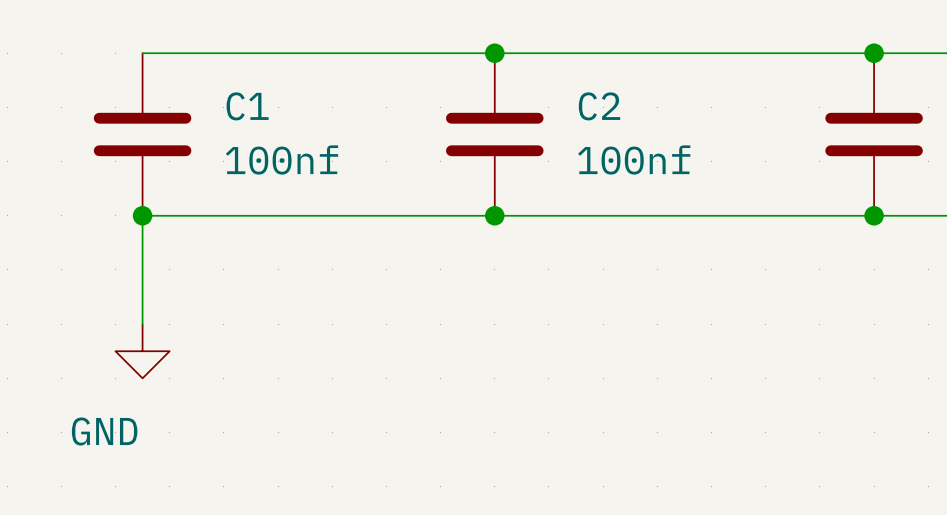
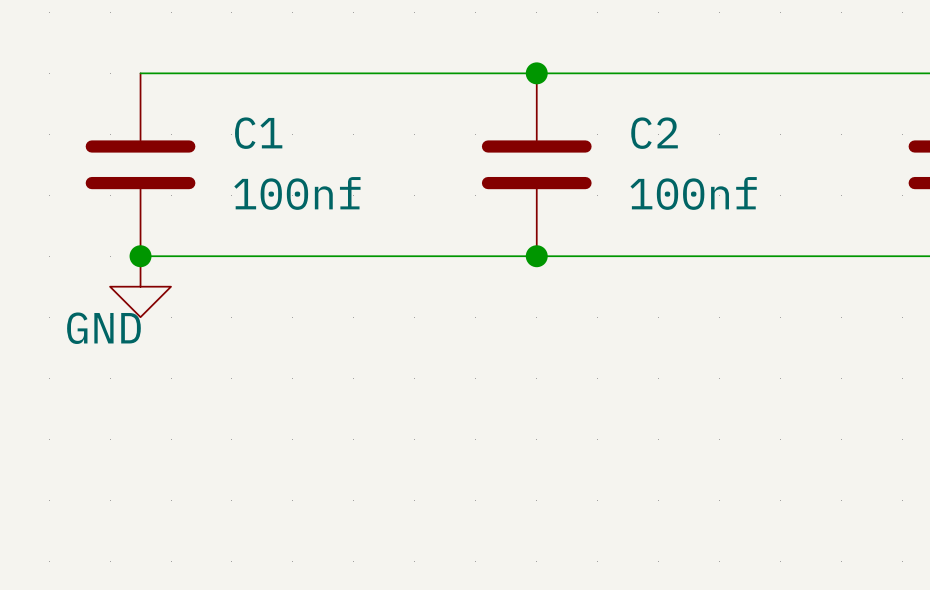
wire: (142, 215) (142, 324) -> none
power symbol position: GND (142, 351) -> GND (140, 286)
power symbol text position: GND (104, 431) -> GND (103, 328)

